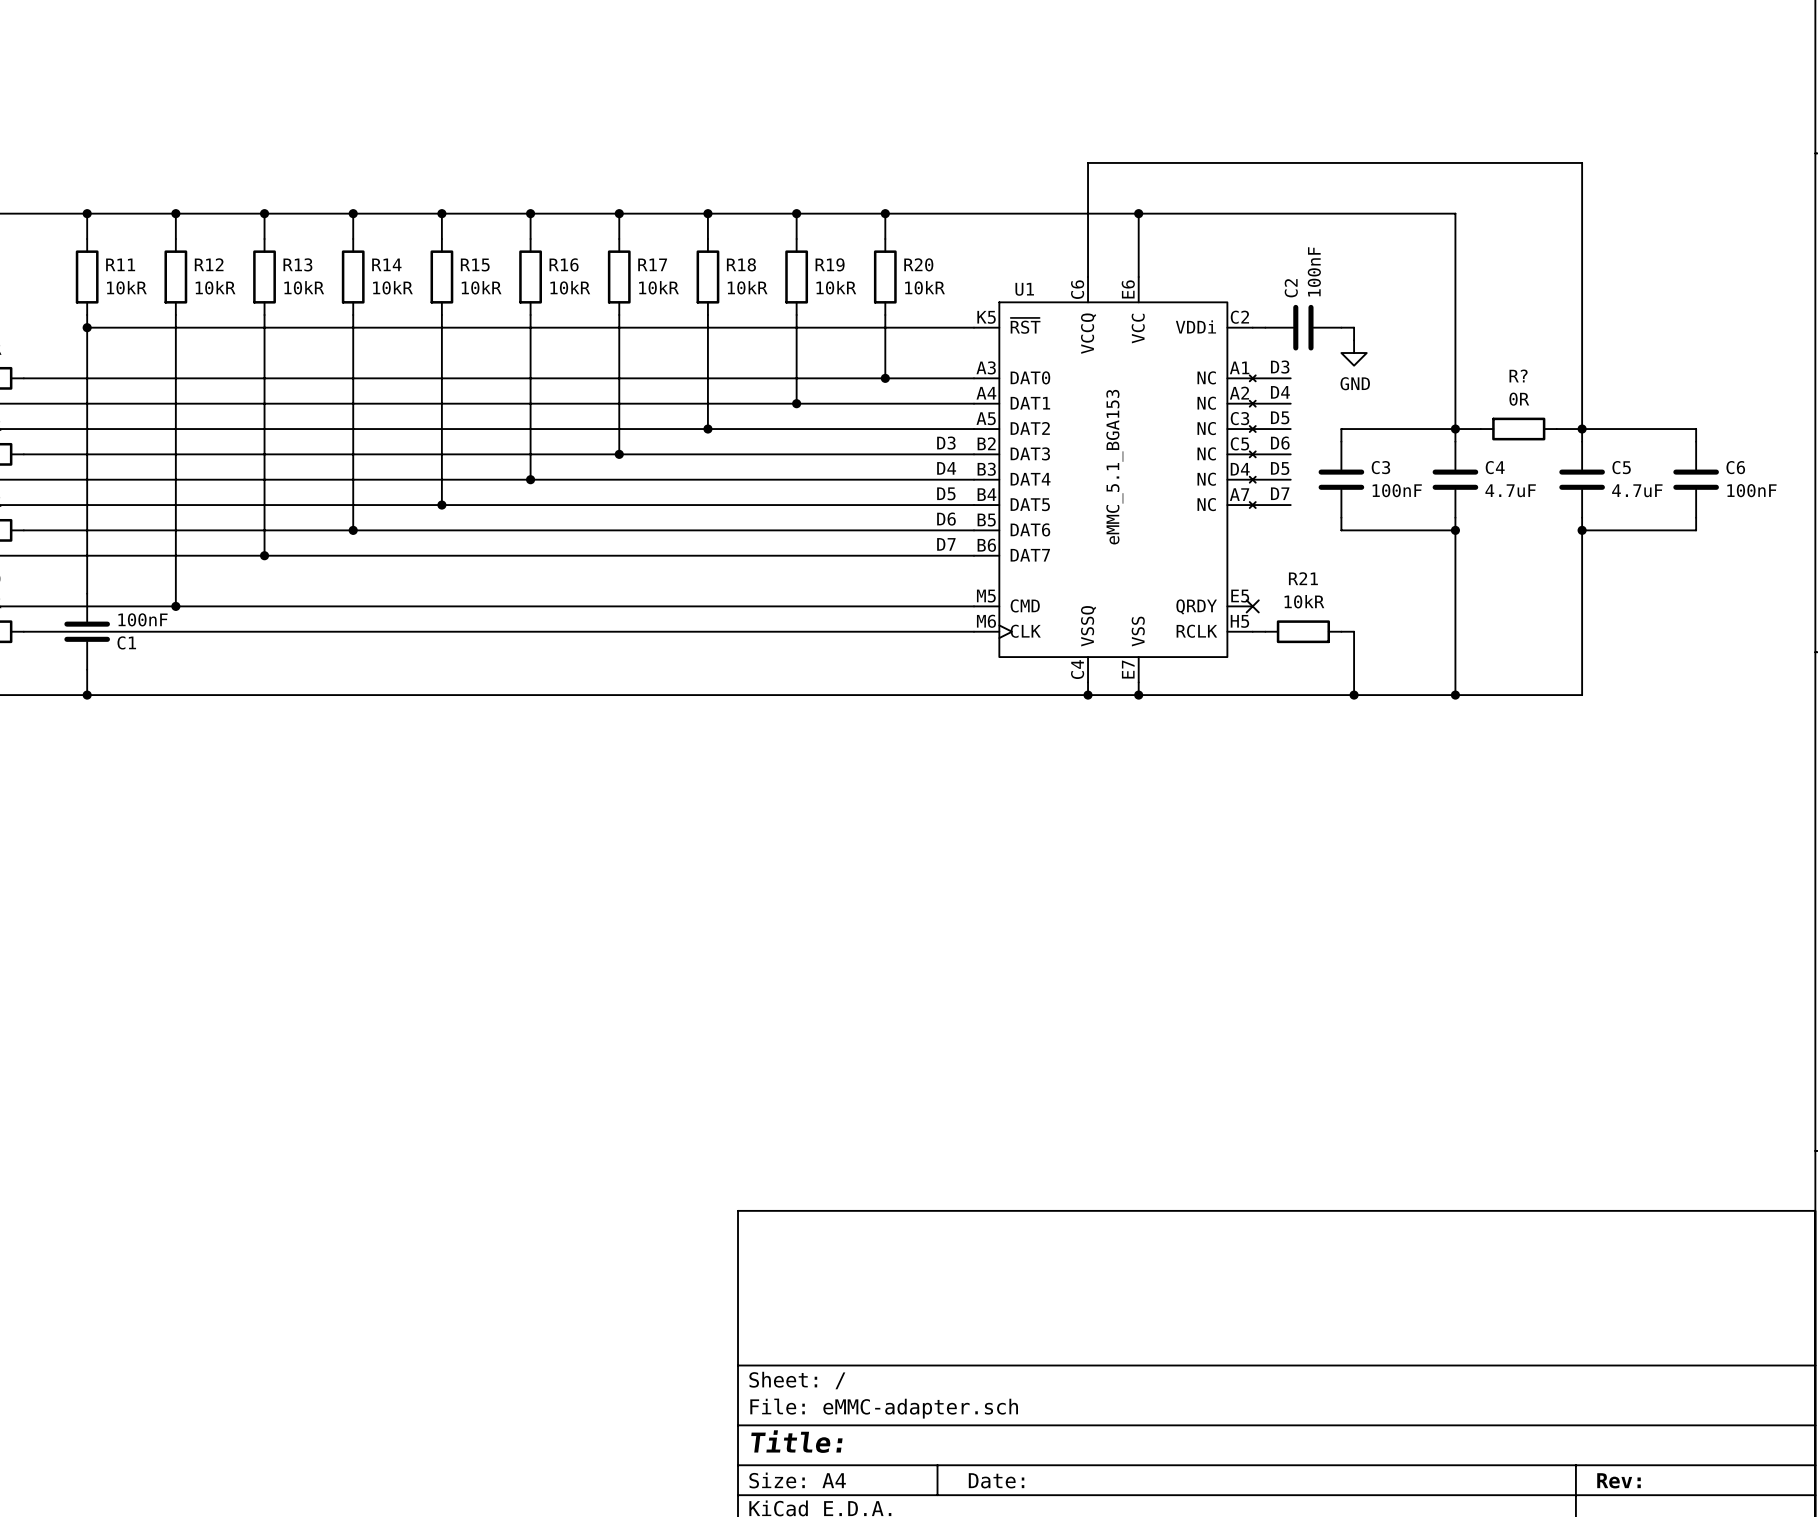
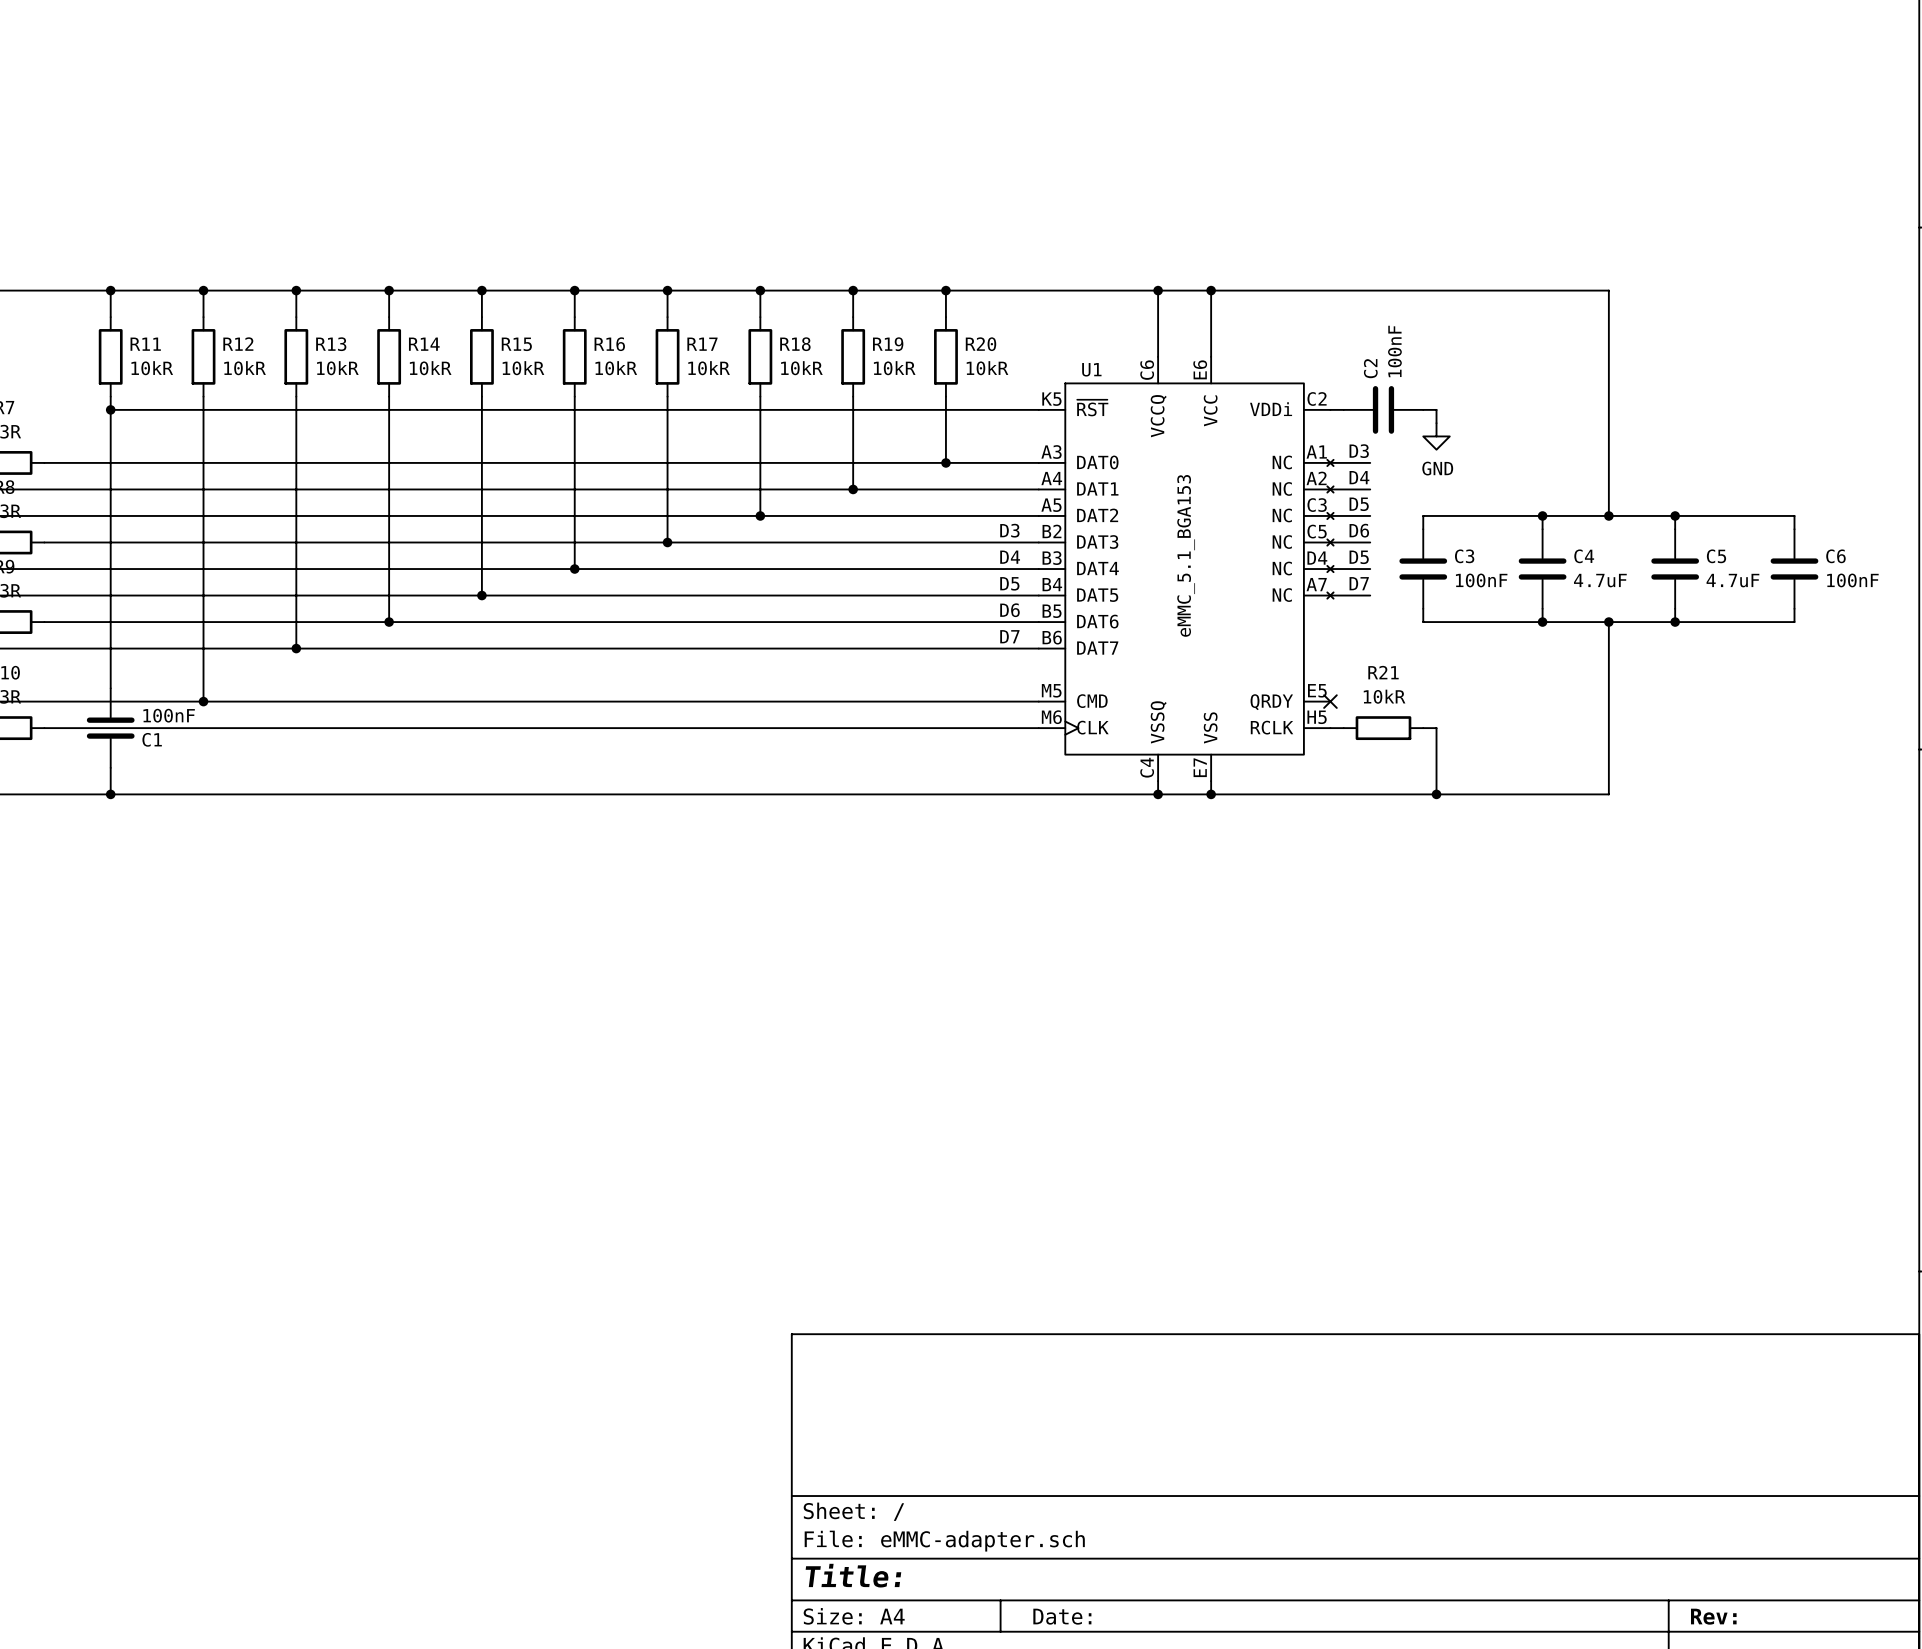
wire: (1088, 213) (1088, 162) (1582, 162) (1582, 429) -> none
junction: none -> (1158, 290)
wire: (1455, 213) (1455, 429) -> (1542, 290) (1608, 290) (1608, 515)
wire: none -> (1569, 515) (1648, 515)
junction: none -> (1608, 515)
R?: 0R (1518, 429) -> none
wire: (1455, 530) (1455, 695) -> (1542, 622) (1675, 622)
junction: none -> (1608, 622)
wire: (1582, 530) (1582, 695) (1518, 695) -> (1608, 622) (1608, 794)
junction: (1455, 695) -> none

